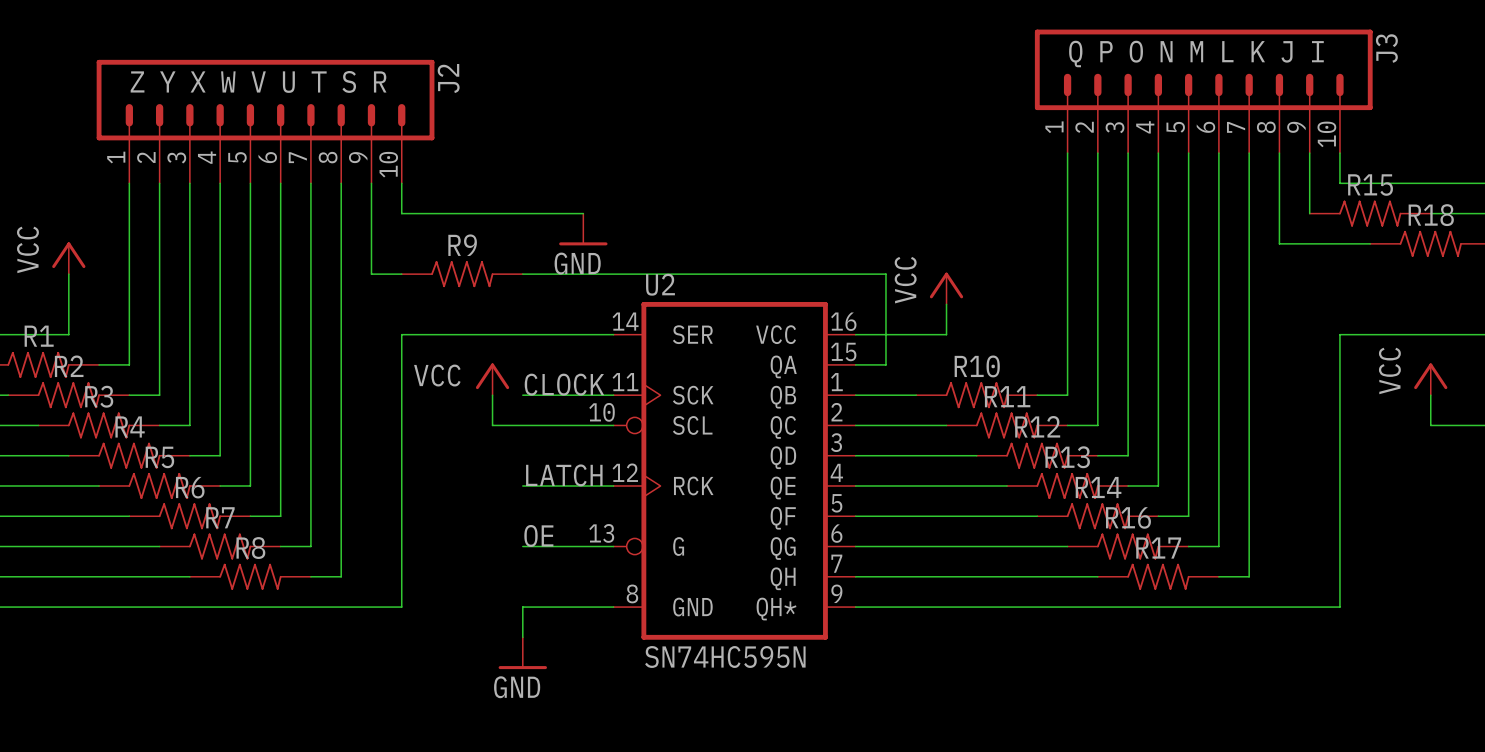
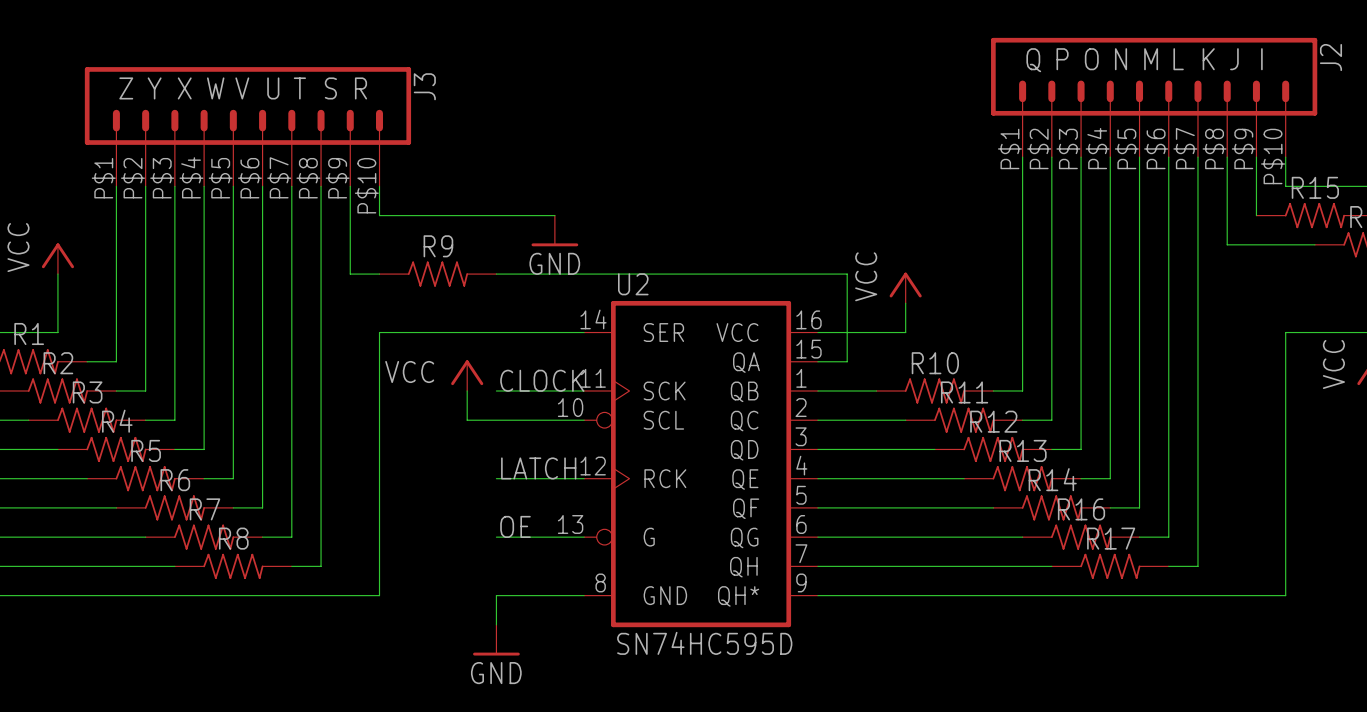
J3 symbol: [1034, 29, 1373, 154] -> [84, 67, 412, 187]
J2 symbol: [96, 59, 435, 184] -> [991, 37, 1318, 158]
U2 value: SN74HC595N (725, 656) -> SN74HC595D (704, 643)

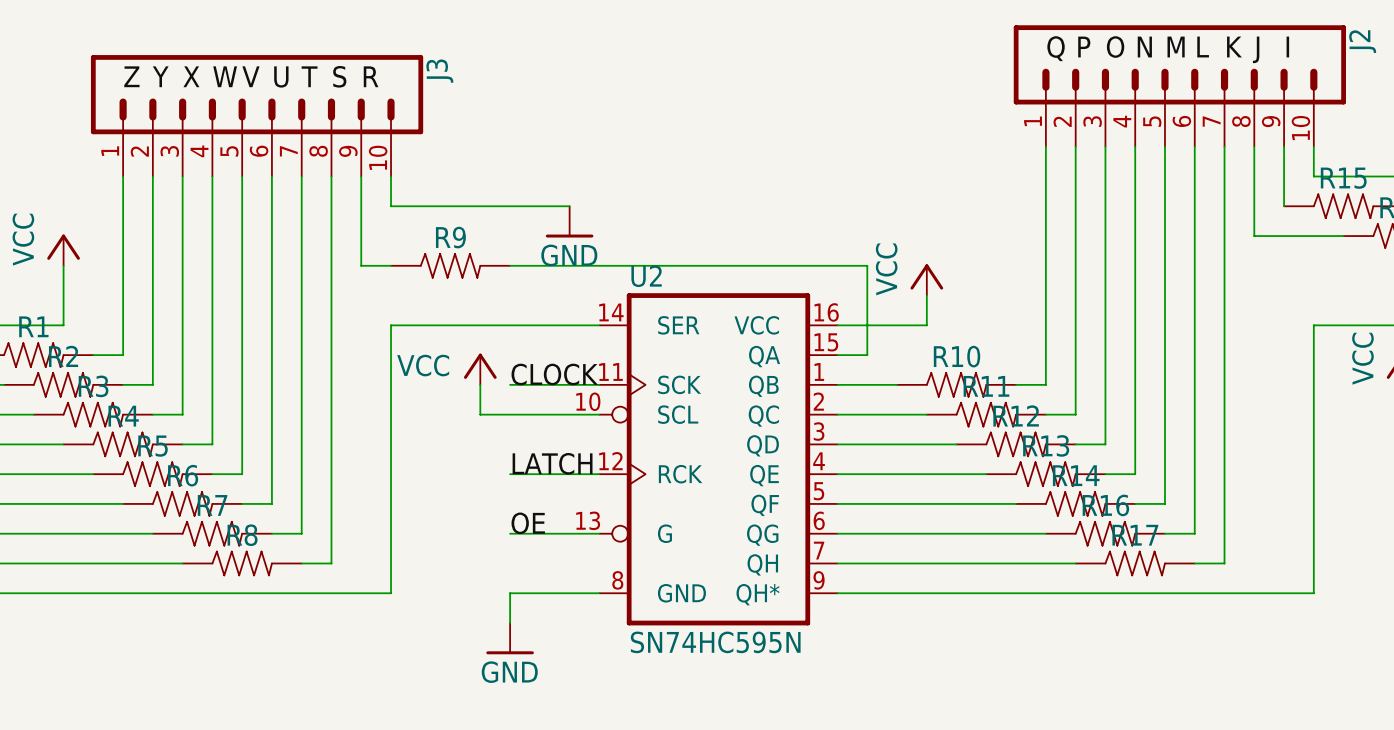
J2 symbol: [991, 37, 1318, 158] -> [1013, 25, 1346, 147]
J3 symbol: [84, 67, 412, 187] -> [90, 55, 424, 177]
U2 value: SN74HC595D (704, 643) -> SN74HC595N (715, 642)

